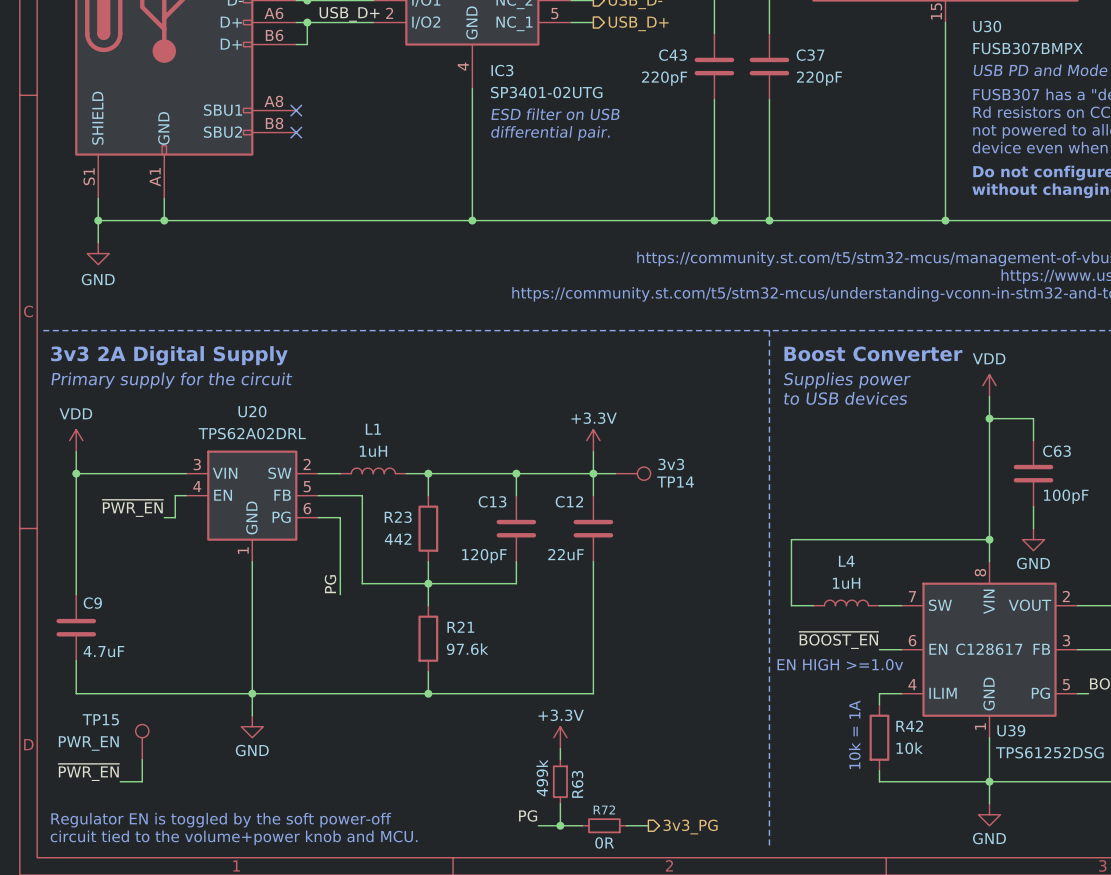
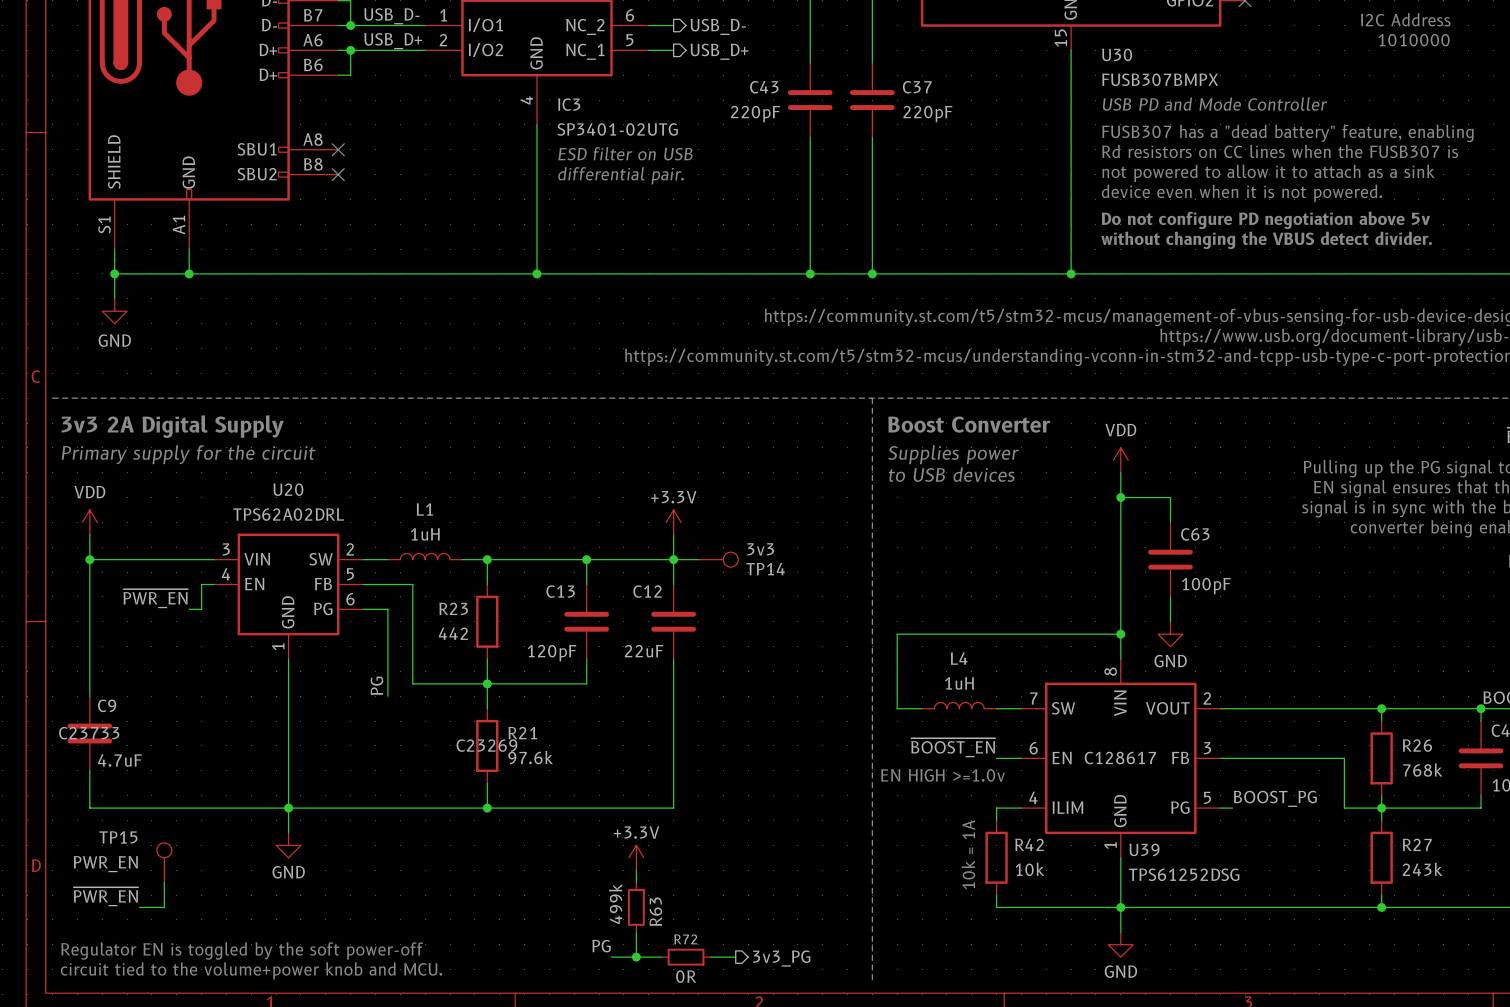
C9 text: none -> C23733 (89, 733)
R21 text: none -> C23269 (486, 745)

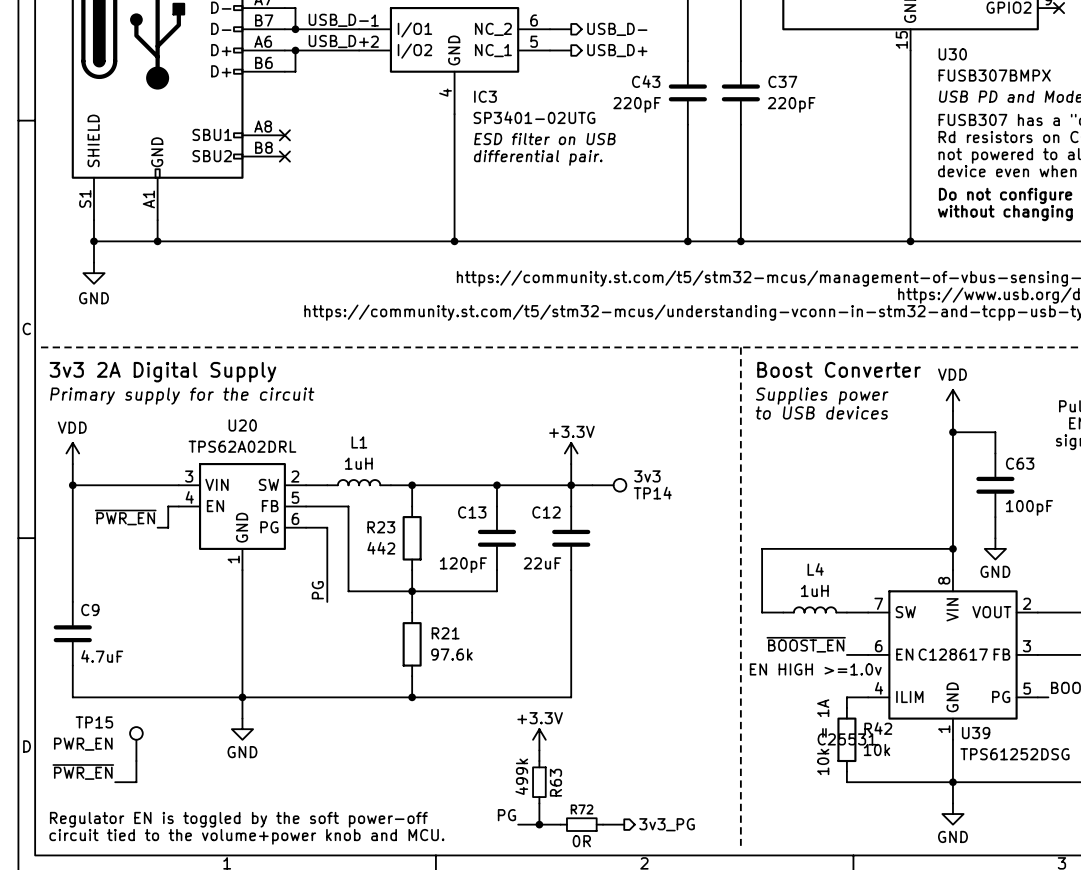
C9 text: C23733 (89, 733) -> none
R21 text: C23269 (486, 745) -> none
R42 text: none -> C25531 (846, 739)

